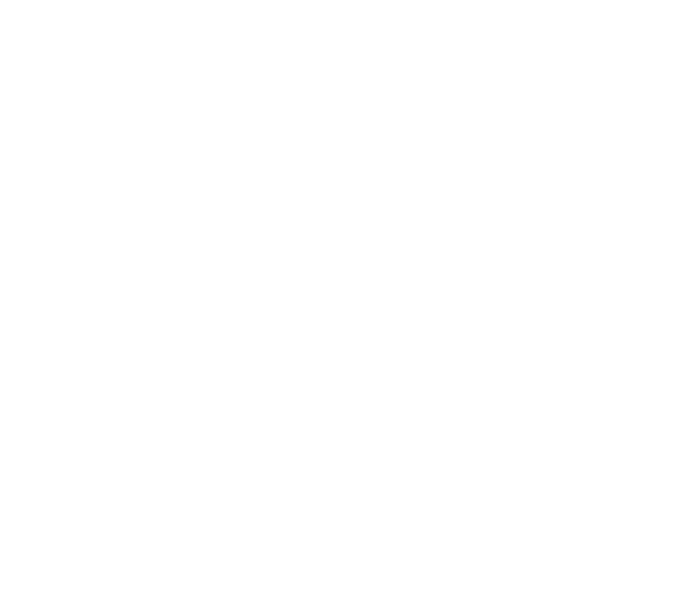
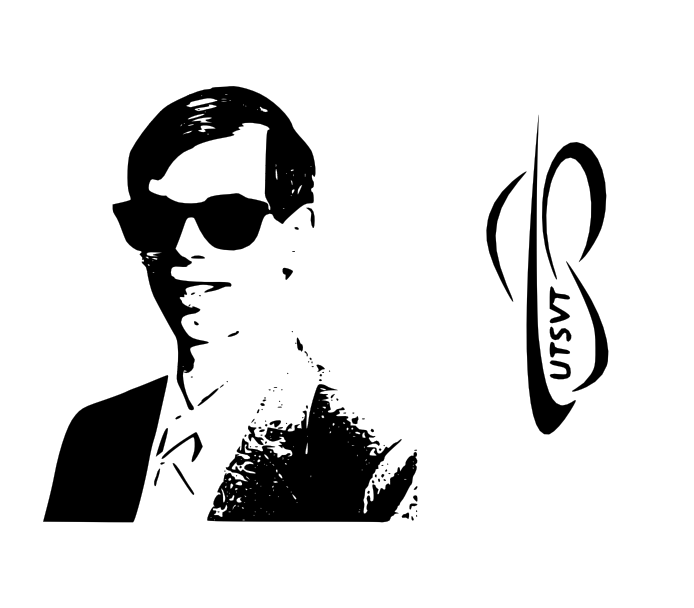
drawing: none -> [43, 86, 418, 523]
drawing: none -> [486, 114, 609, 435]

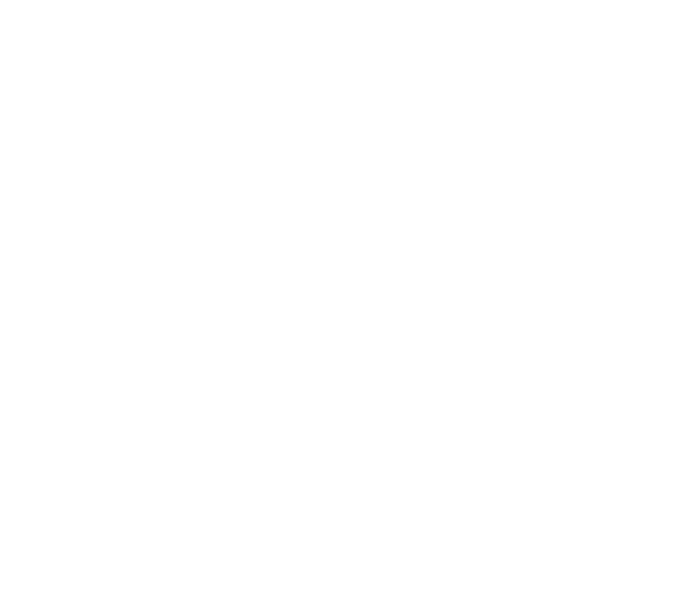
drawing: [43, 86, 418, 523] -> none
drawing: [486, 114, 609, 435] -> none

